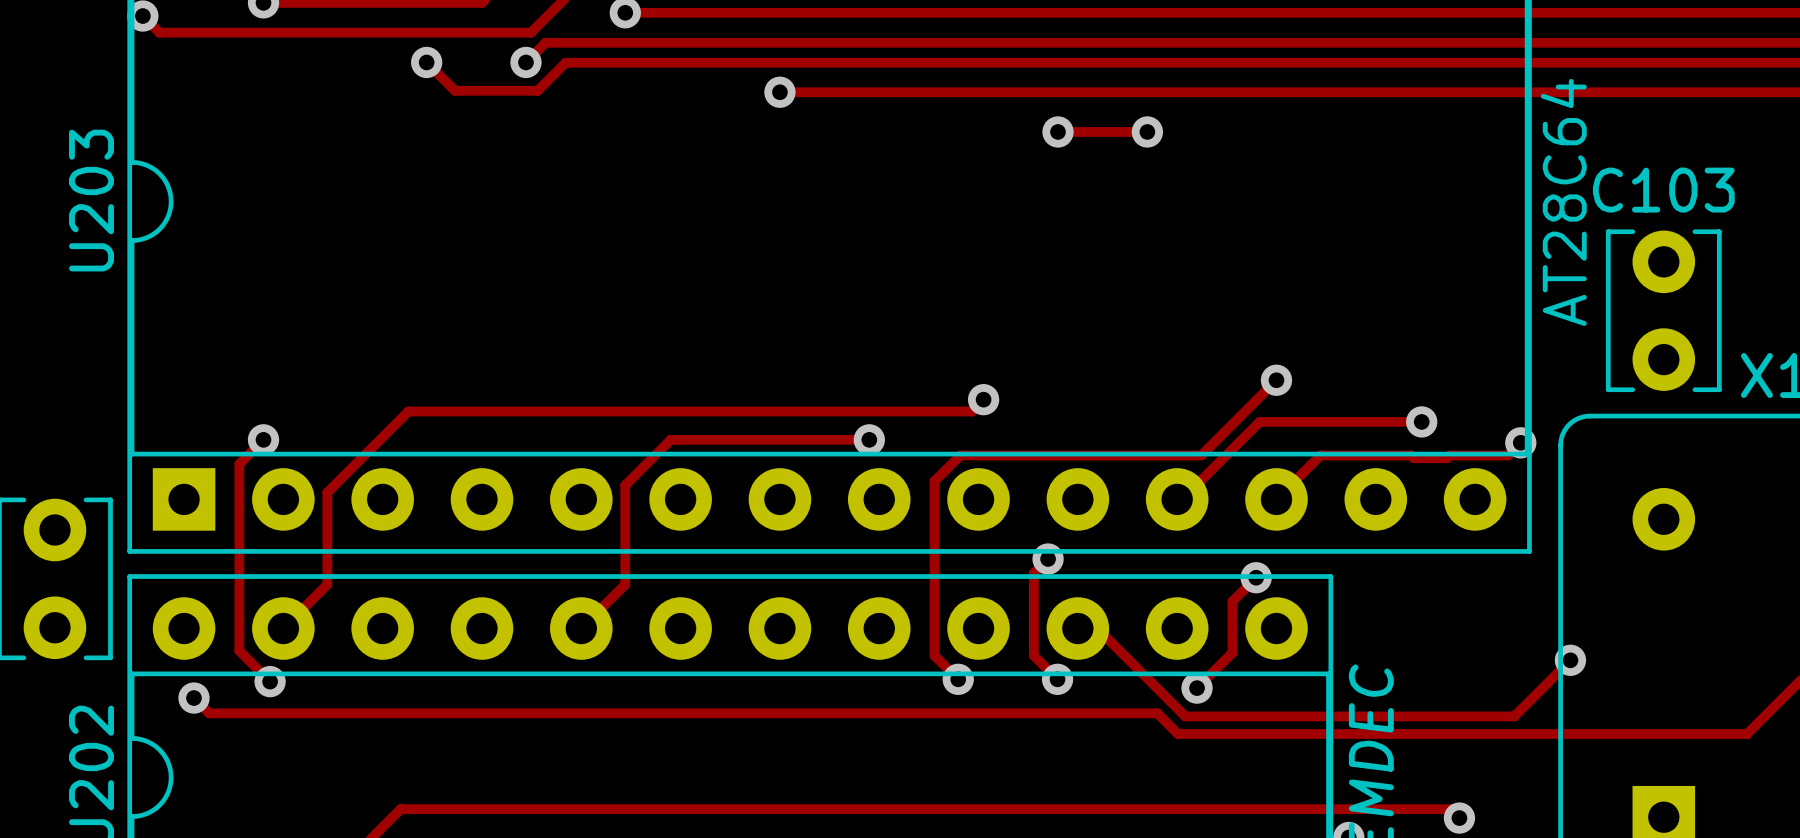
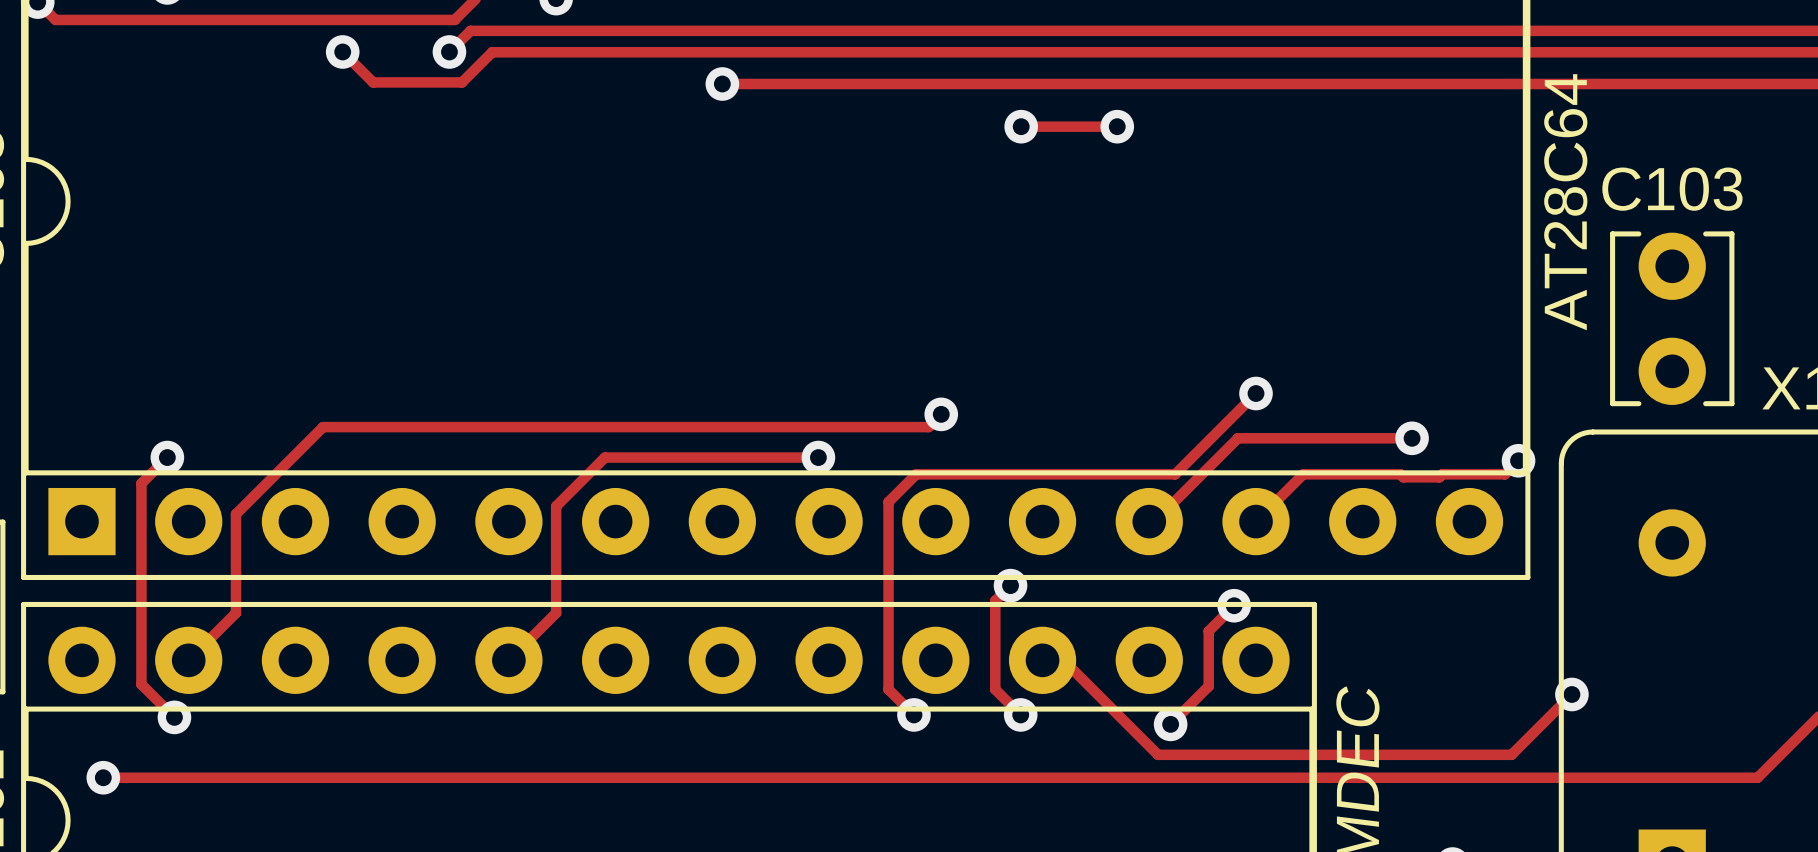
track: (193, 698) (209, 713) (1157, 713) (1178, 734) (1747, 734) -> (103, 777) (1757, 777) (1761, 773)
via position: (193, 698) -> (103, 777)

